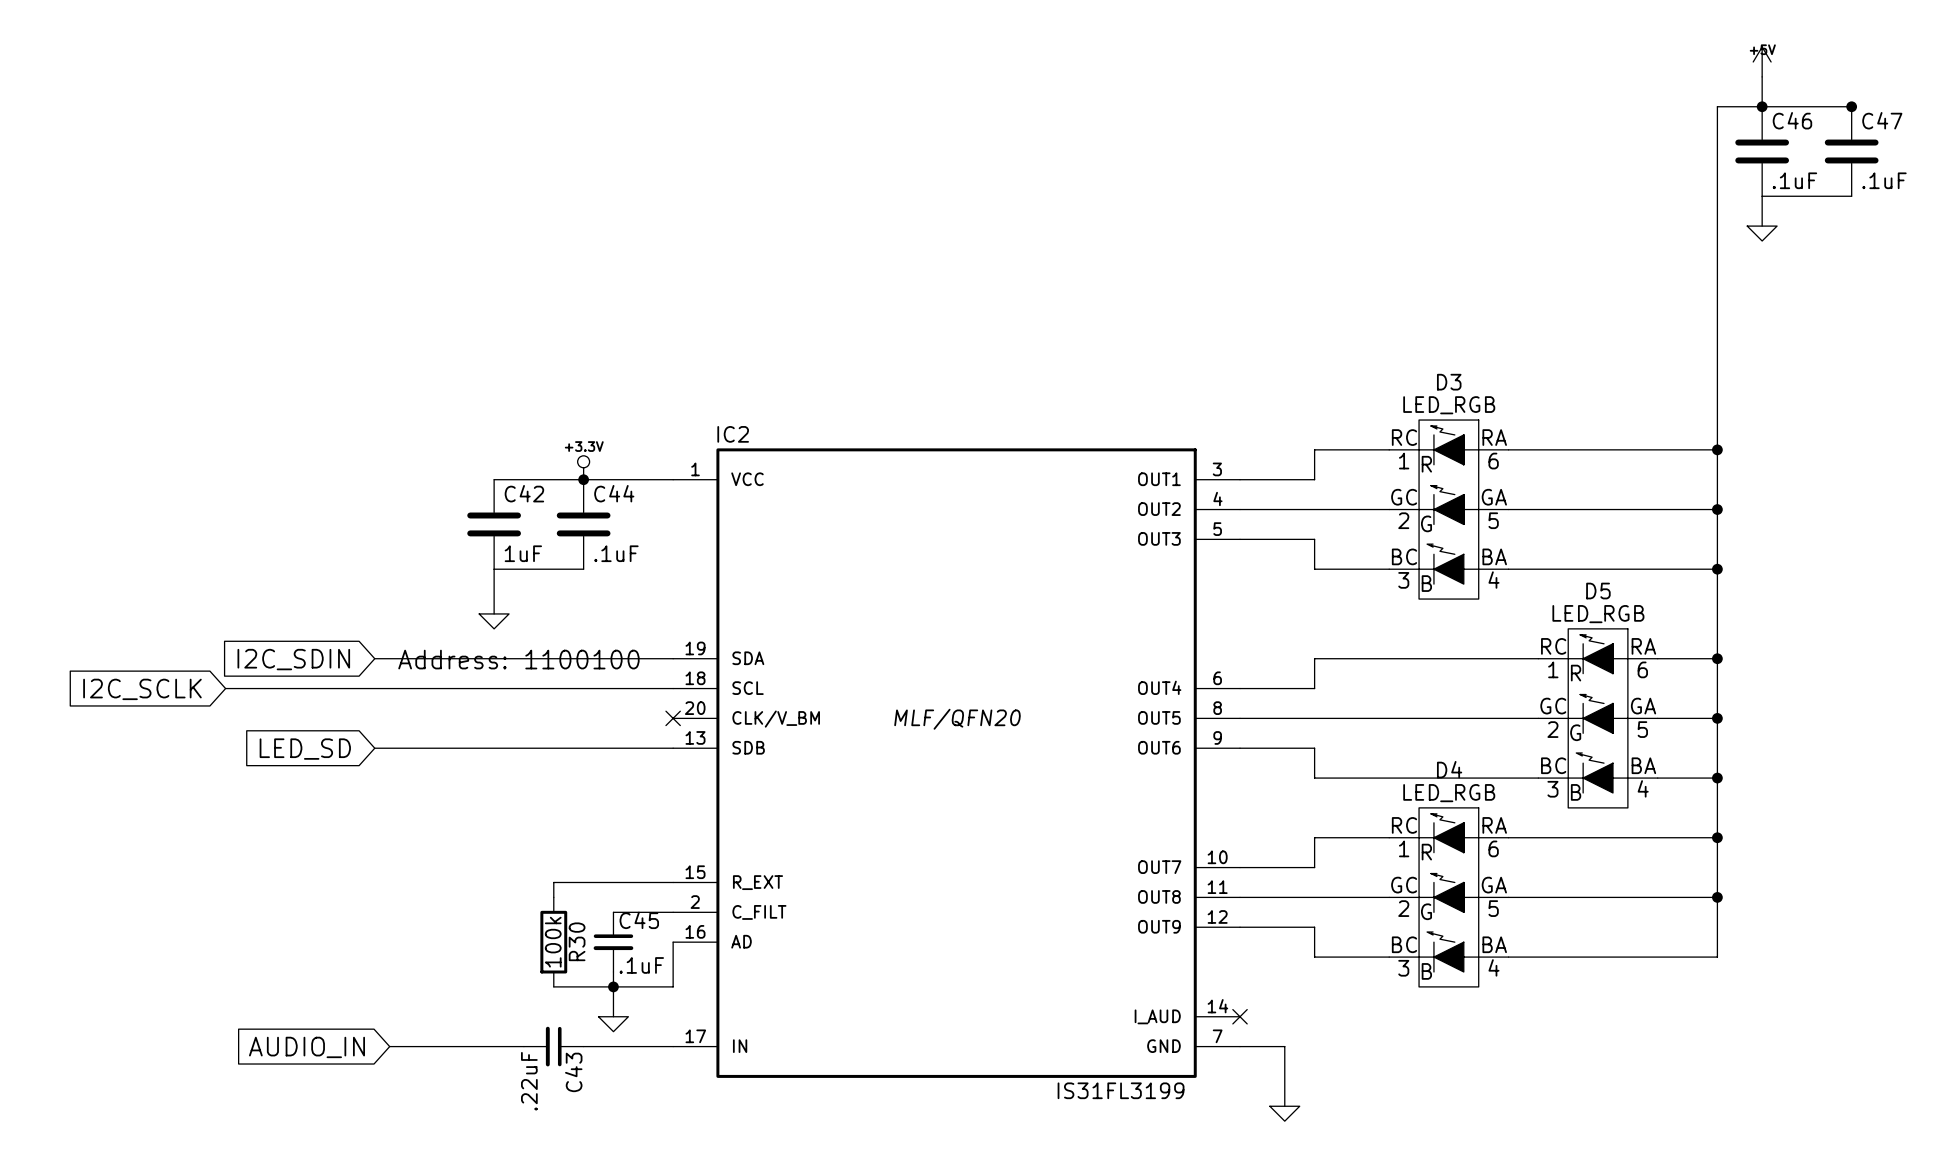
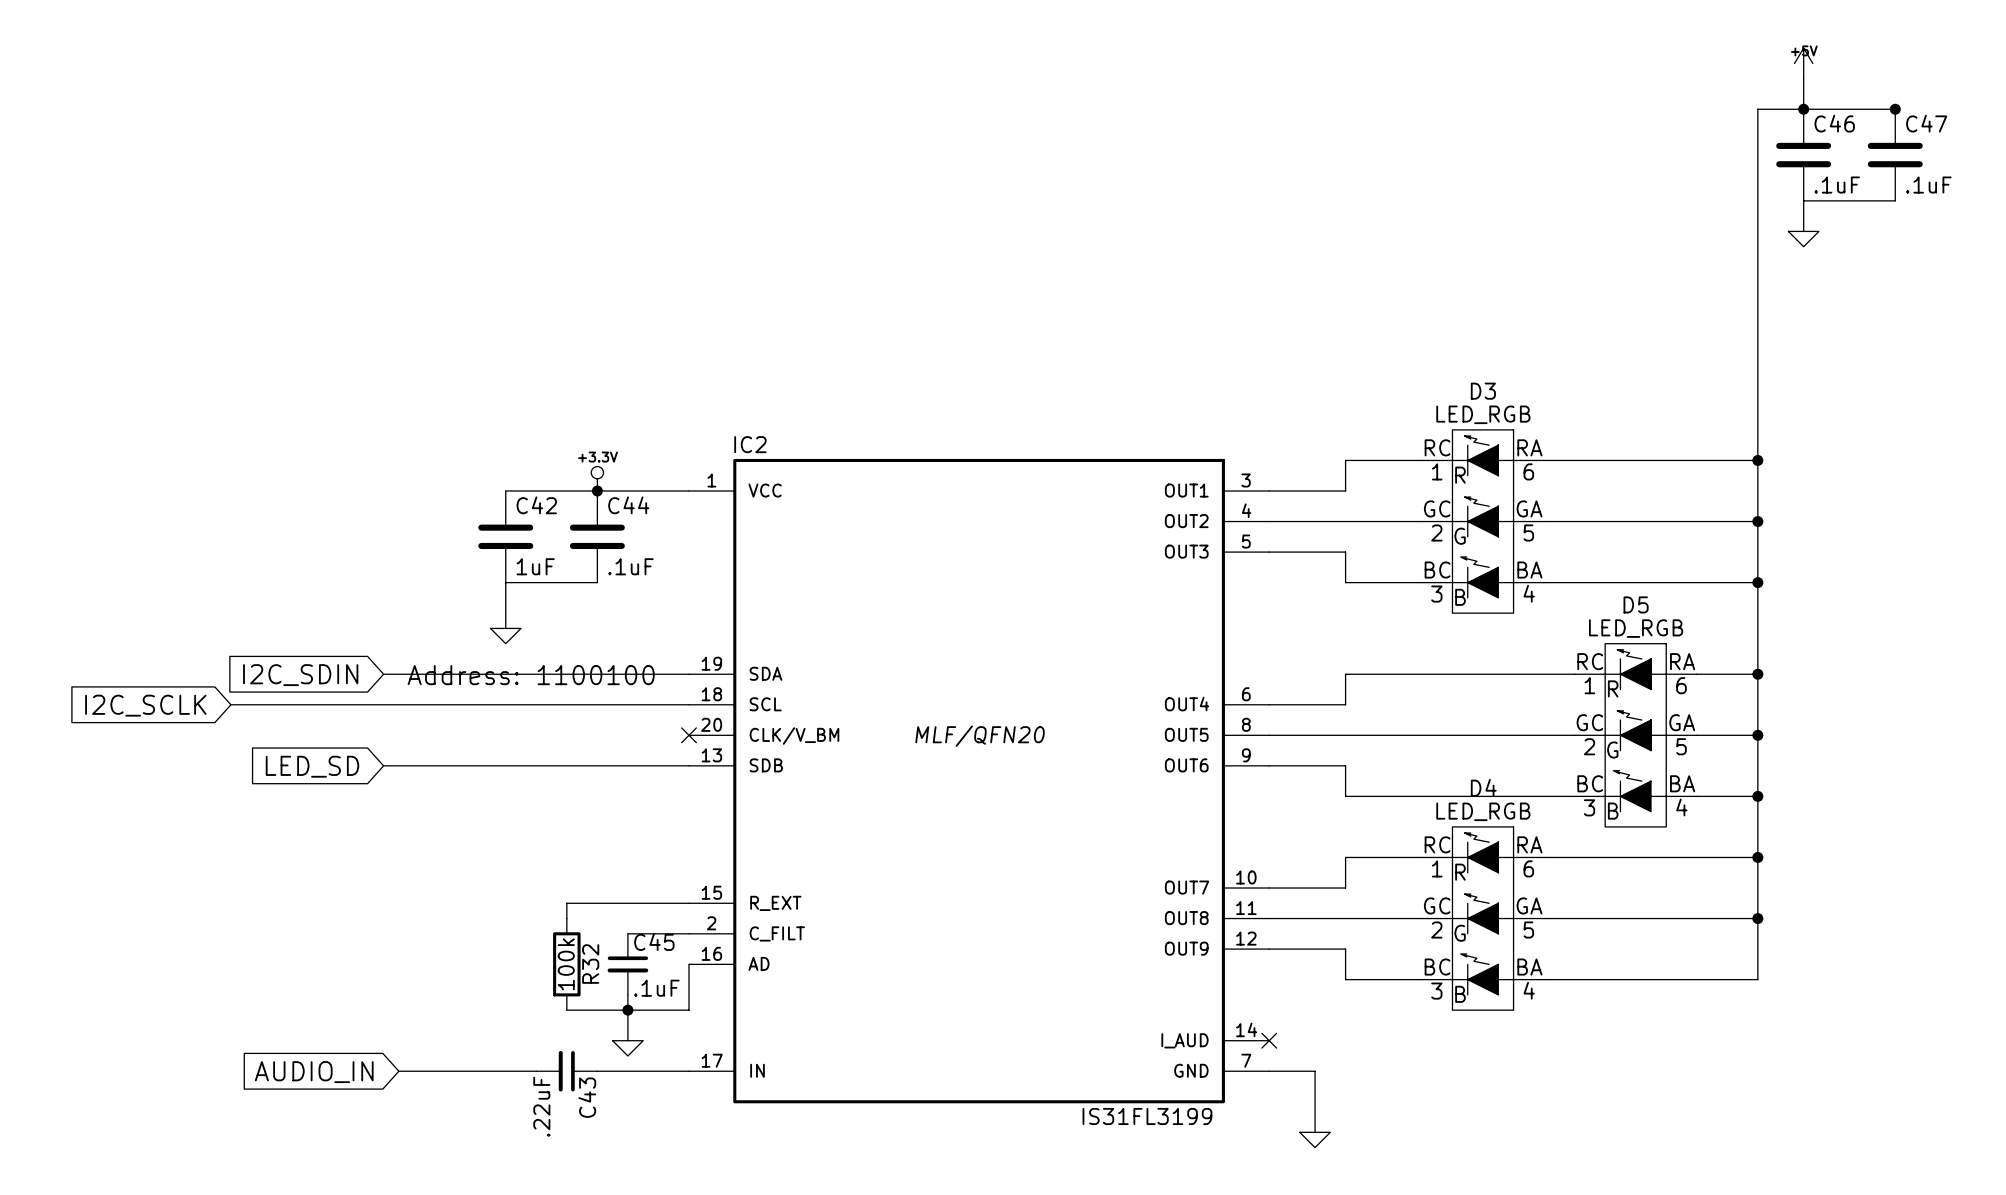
R30 name: R30 (577, 941) -> R32 (590, 963)

